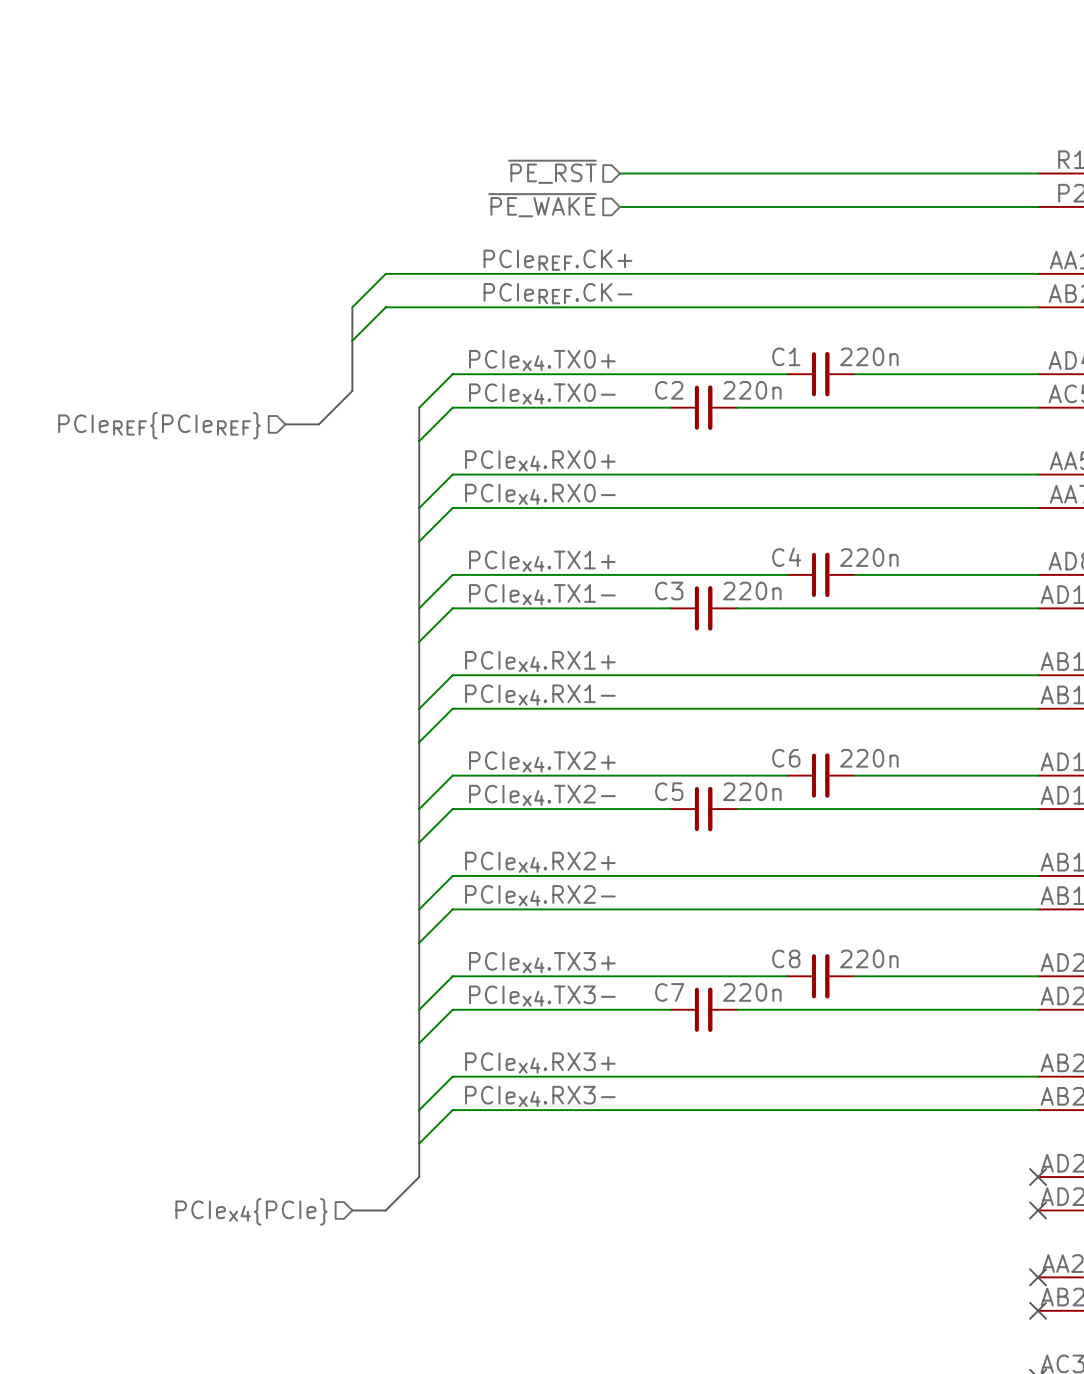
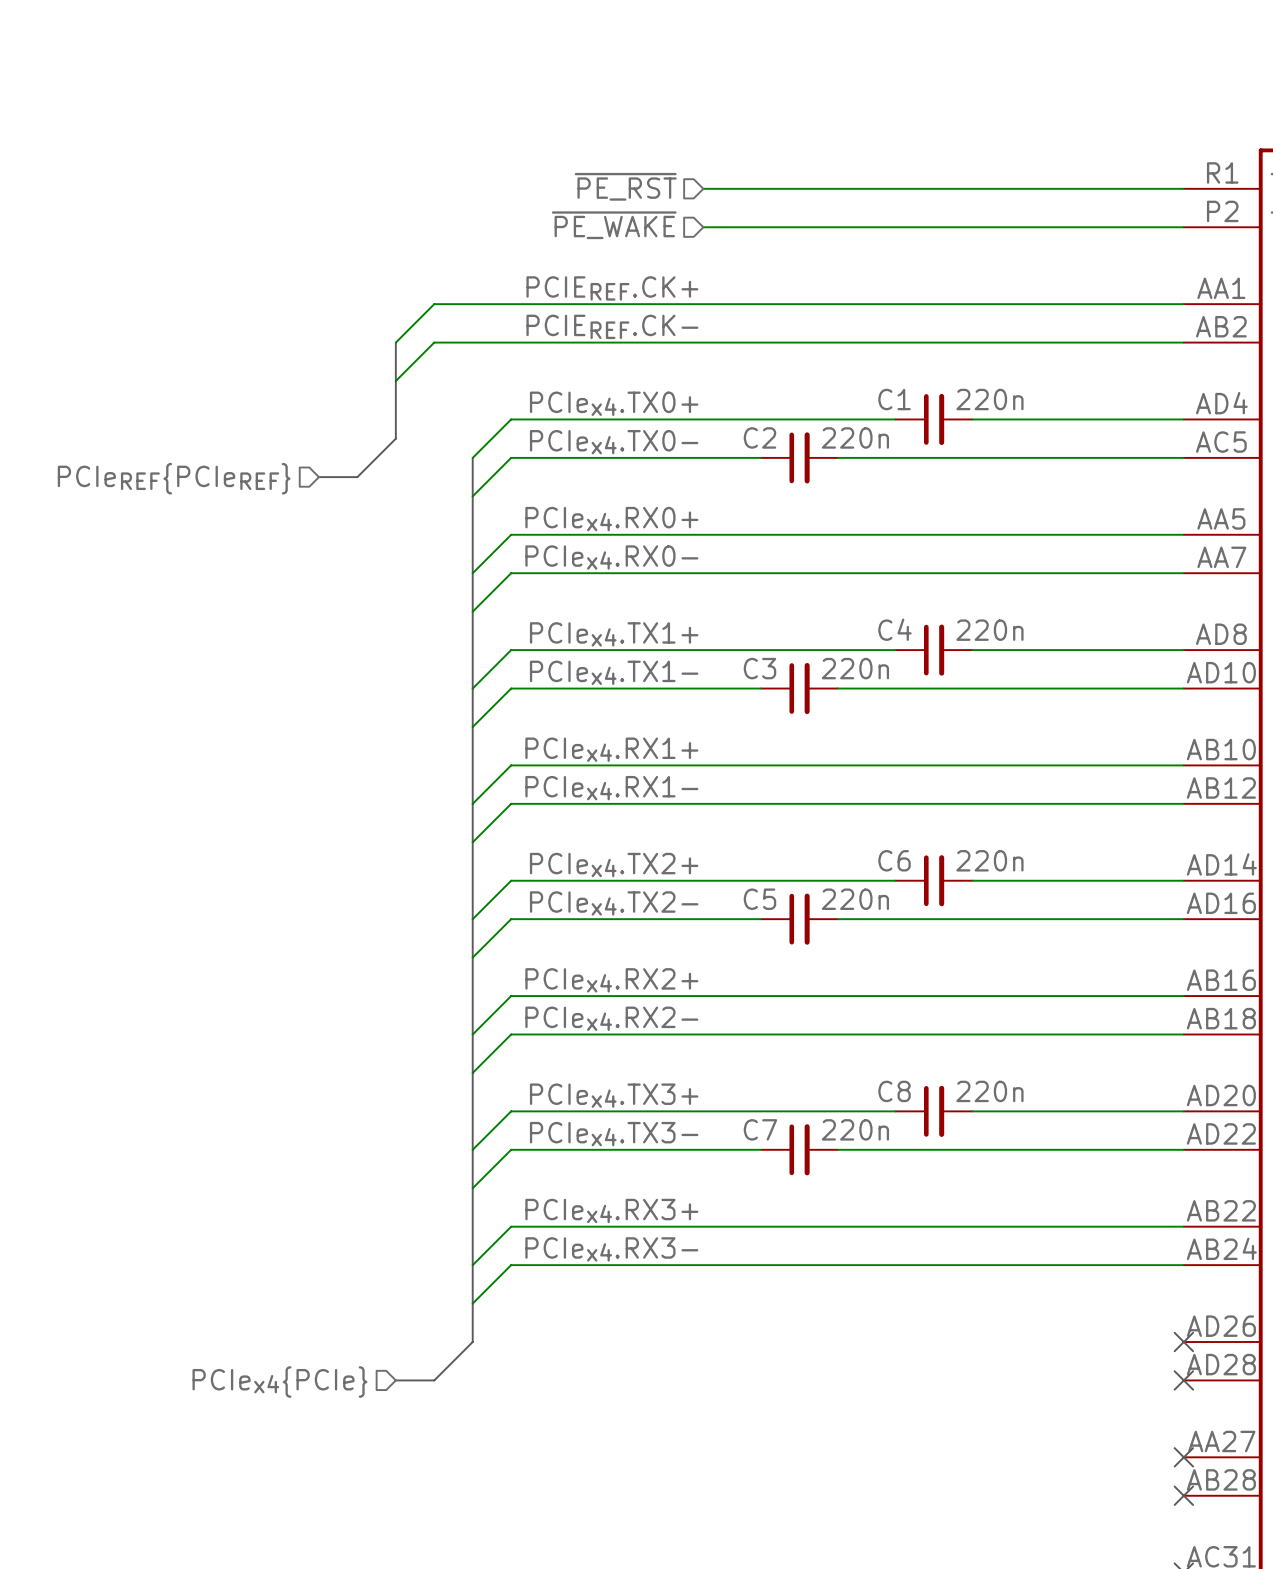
label: PCIeREF.CK+ (557, 260) -> PCIEREF.CK+ (612, 288)
label: PCIeREF.CK- (557, 293) -> PCIEREF.CK- (612, 326)

